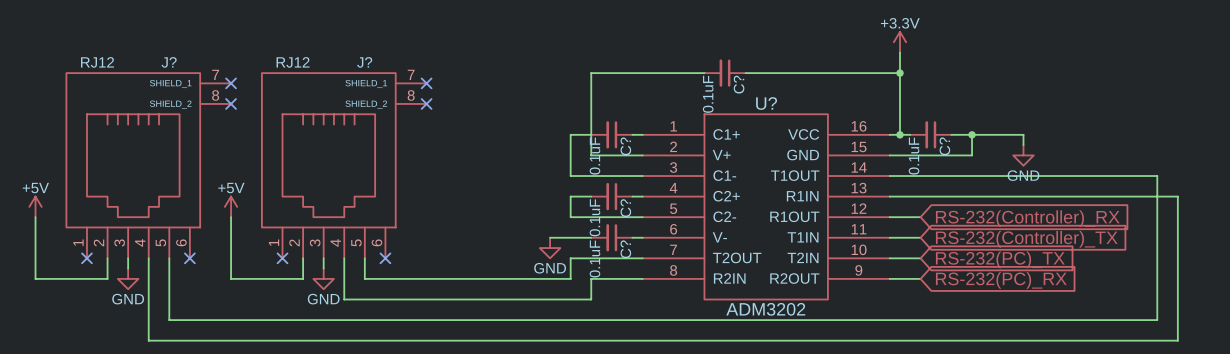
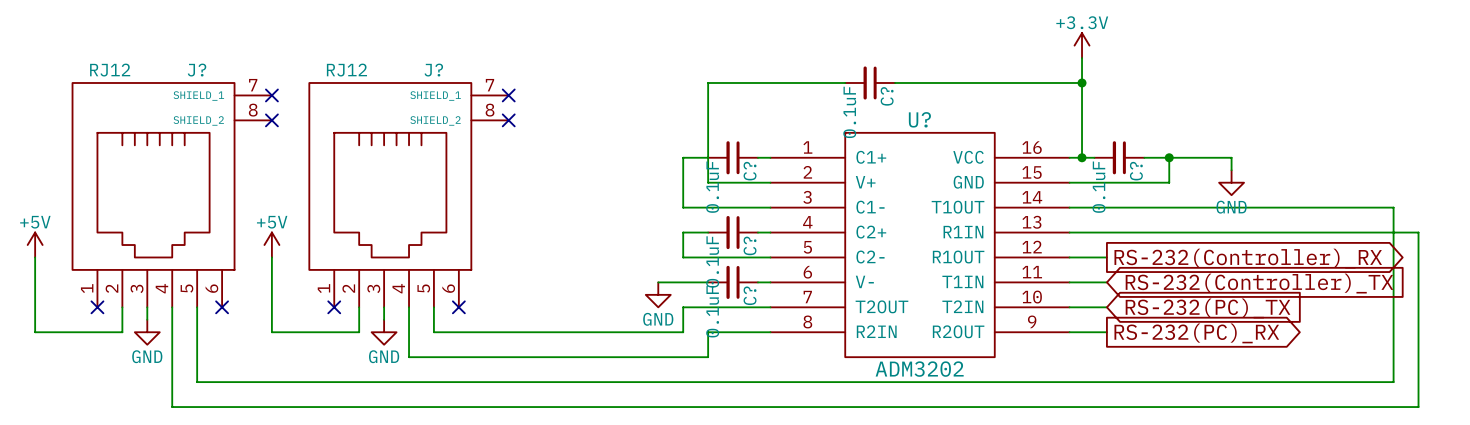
global label shape: input (1027, 218) -> output (1248, 258)
global label shape: input (1001, 280) -> output (1196, 333)

